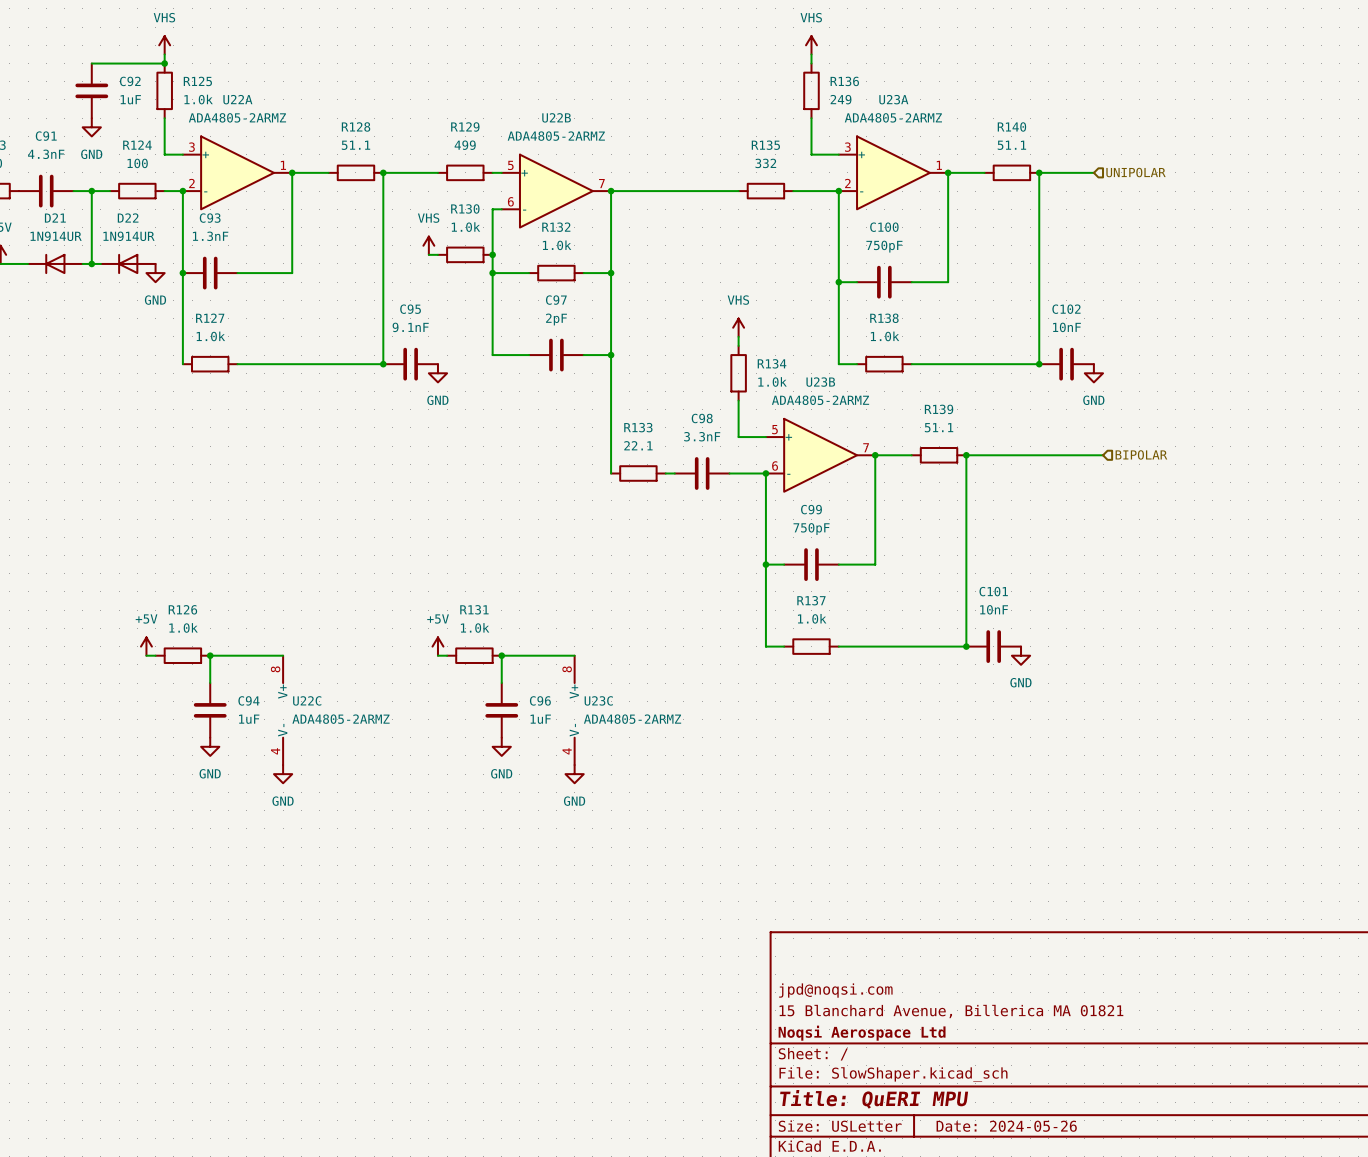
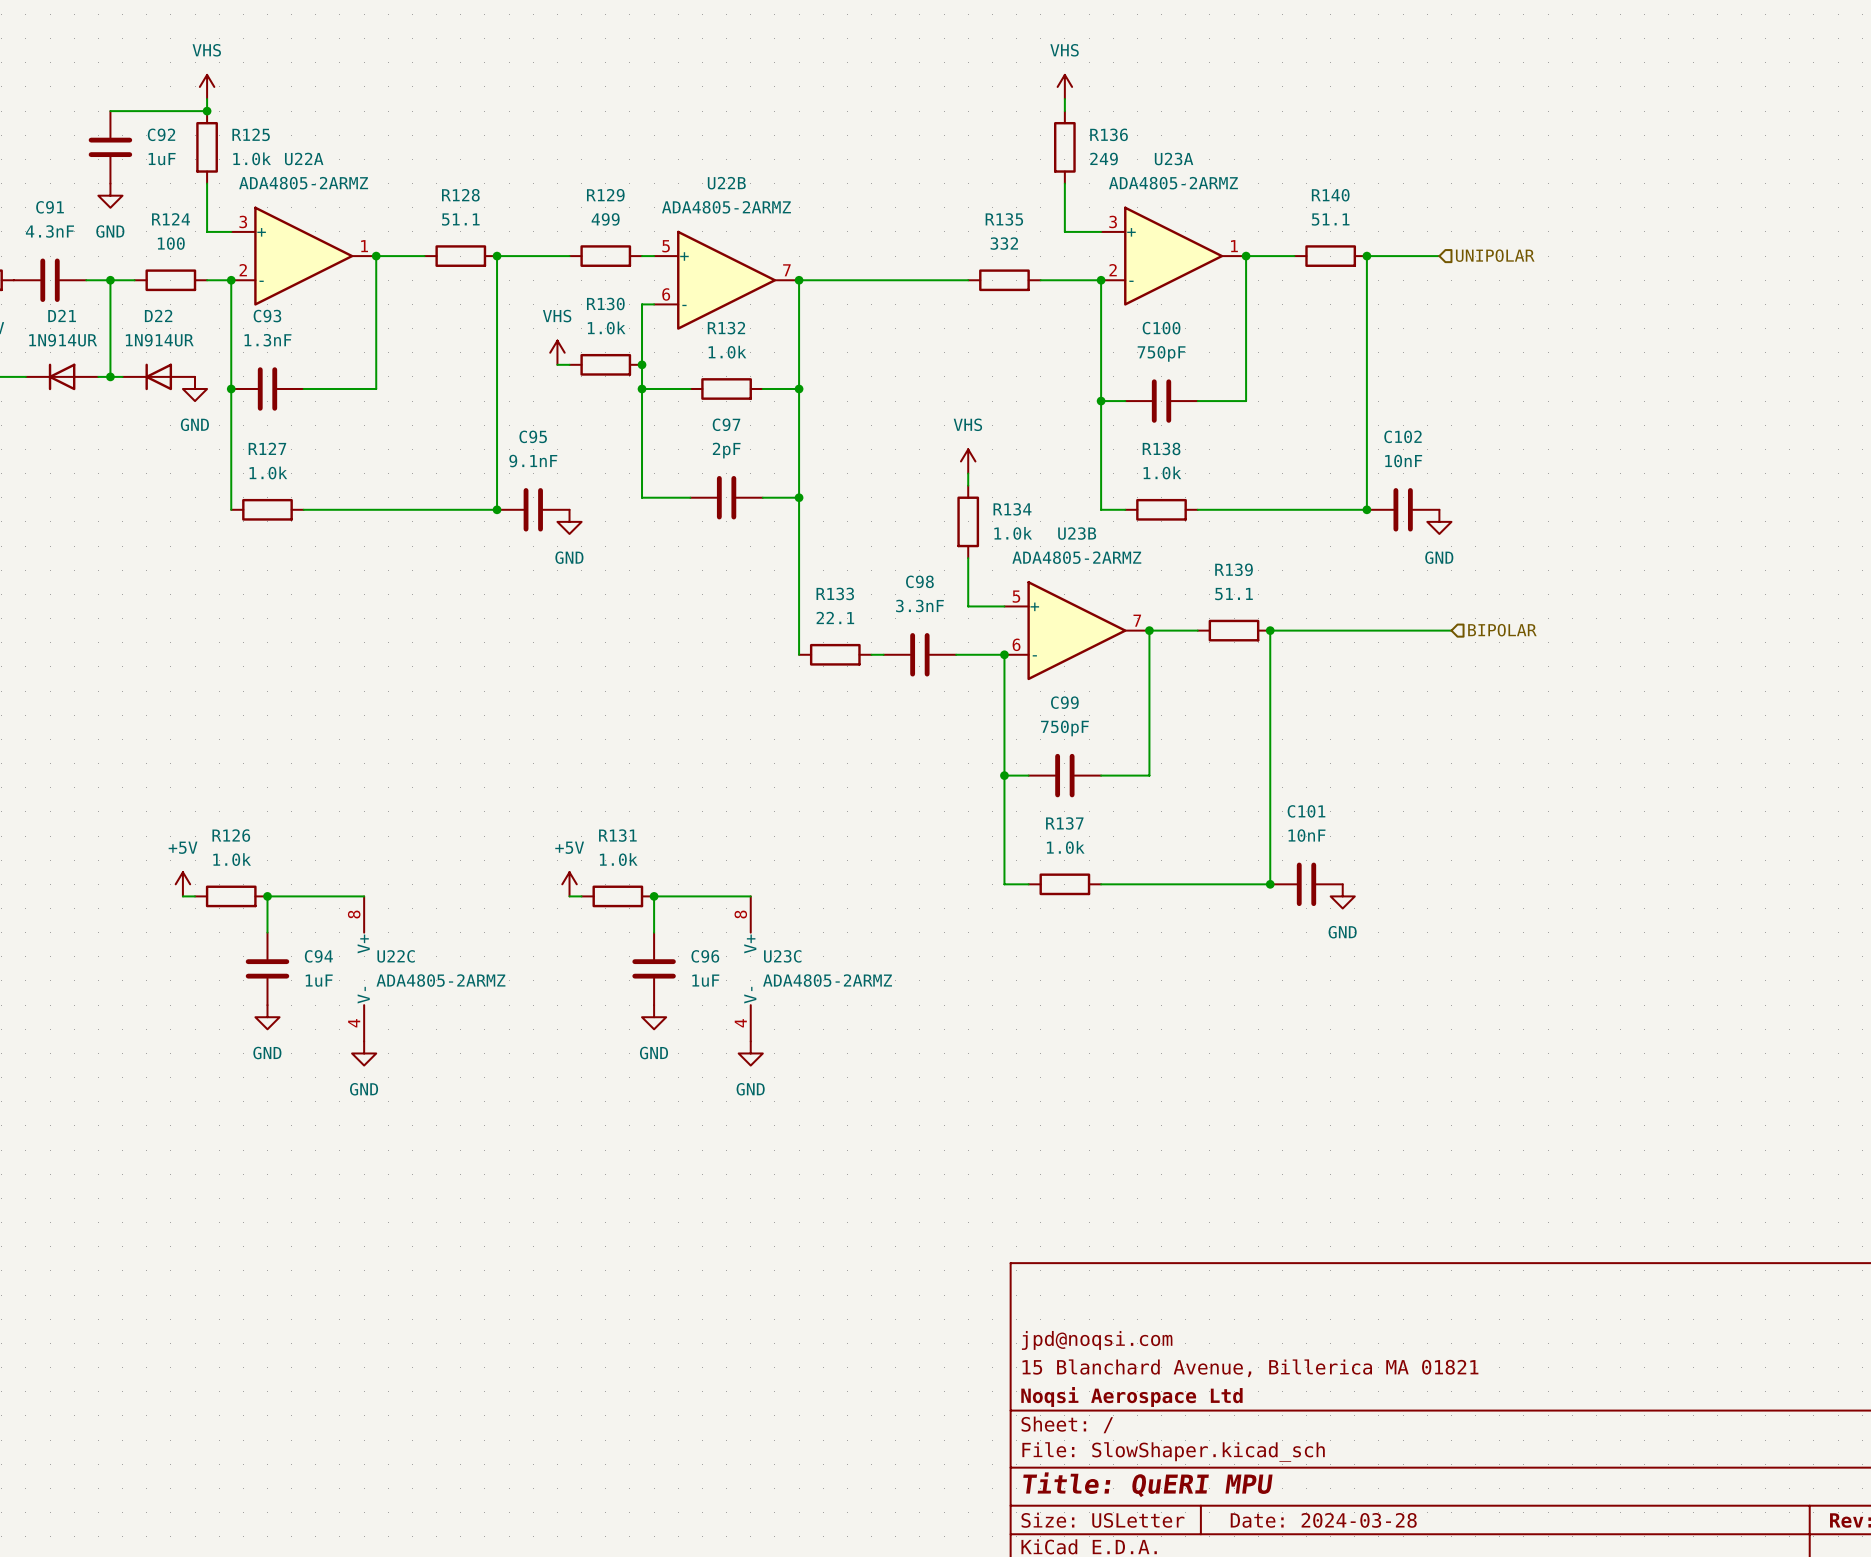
title block: Date: 2024-05-26 (1006, 1126) -> Date: 2024-03-28 (1323, 1520)

